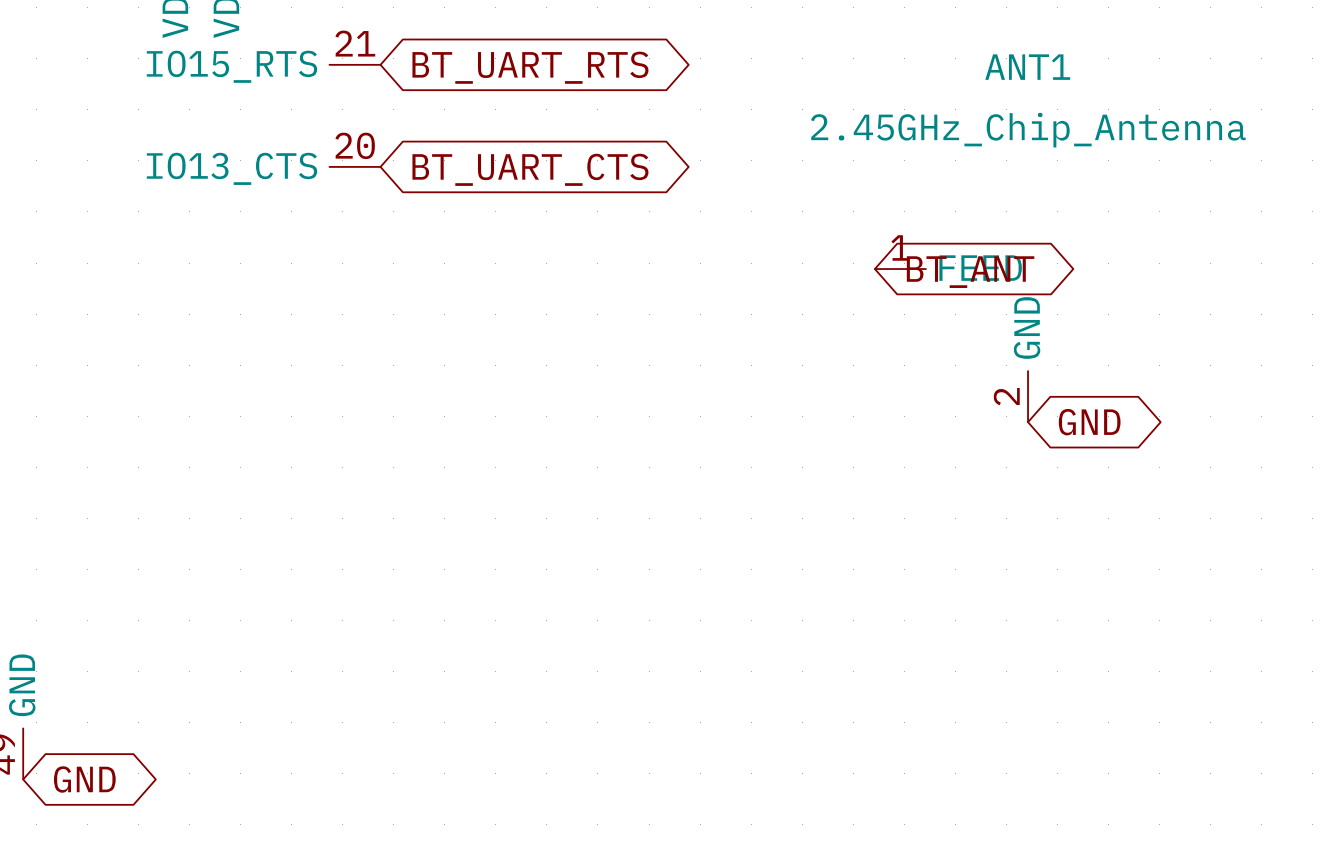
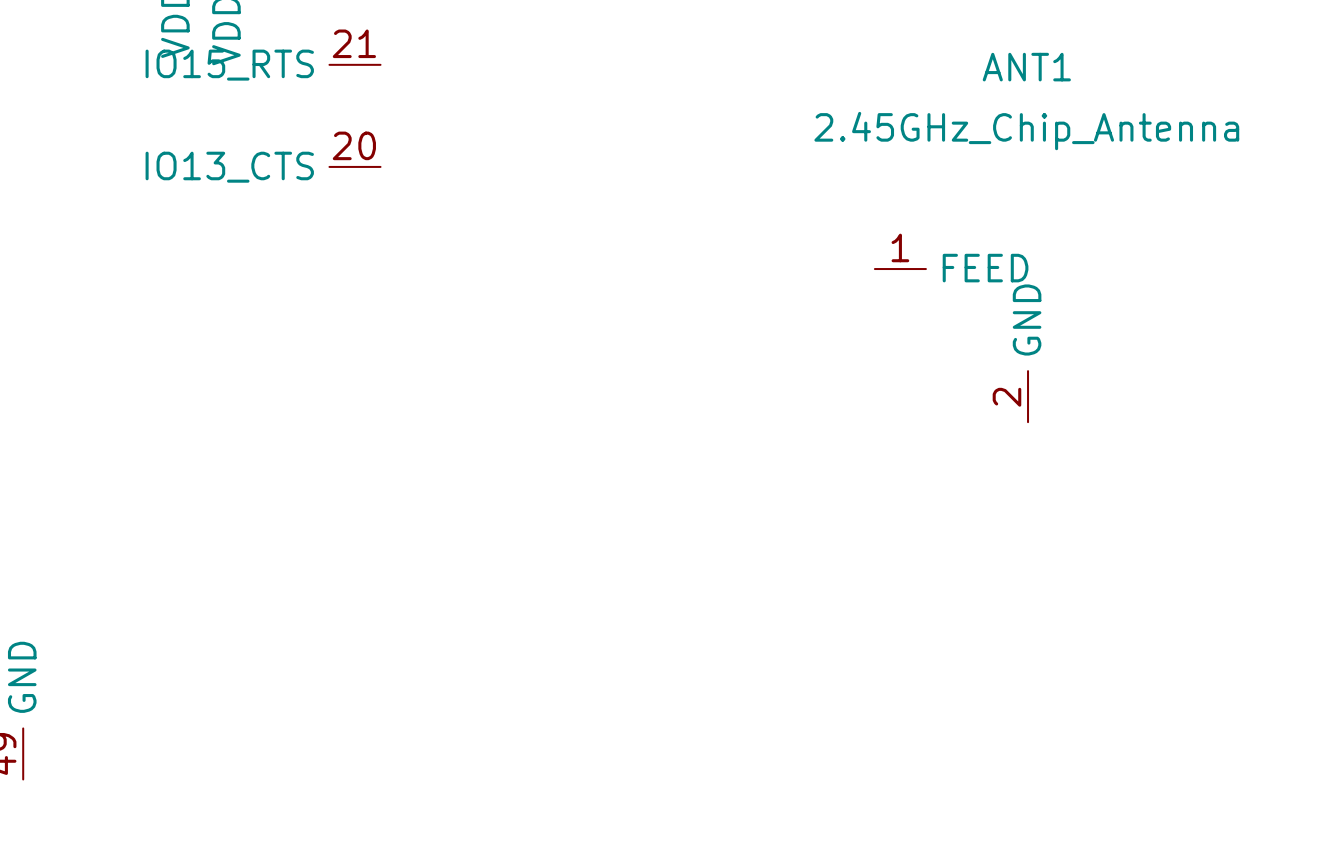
global label: BT_UART_RTS (530, 67) -> none
global label: BT_UART_CTS (530, 169) -> none
global label: BT_ANT (970, 272) -> none
global label: GND (1089, 422) -> none
global label: GND (84, 779) -> none

